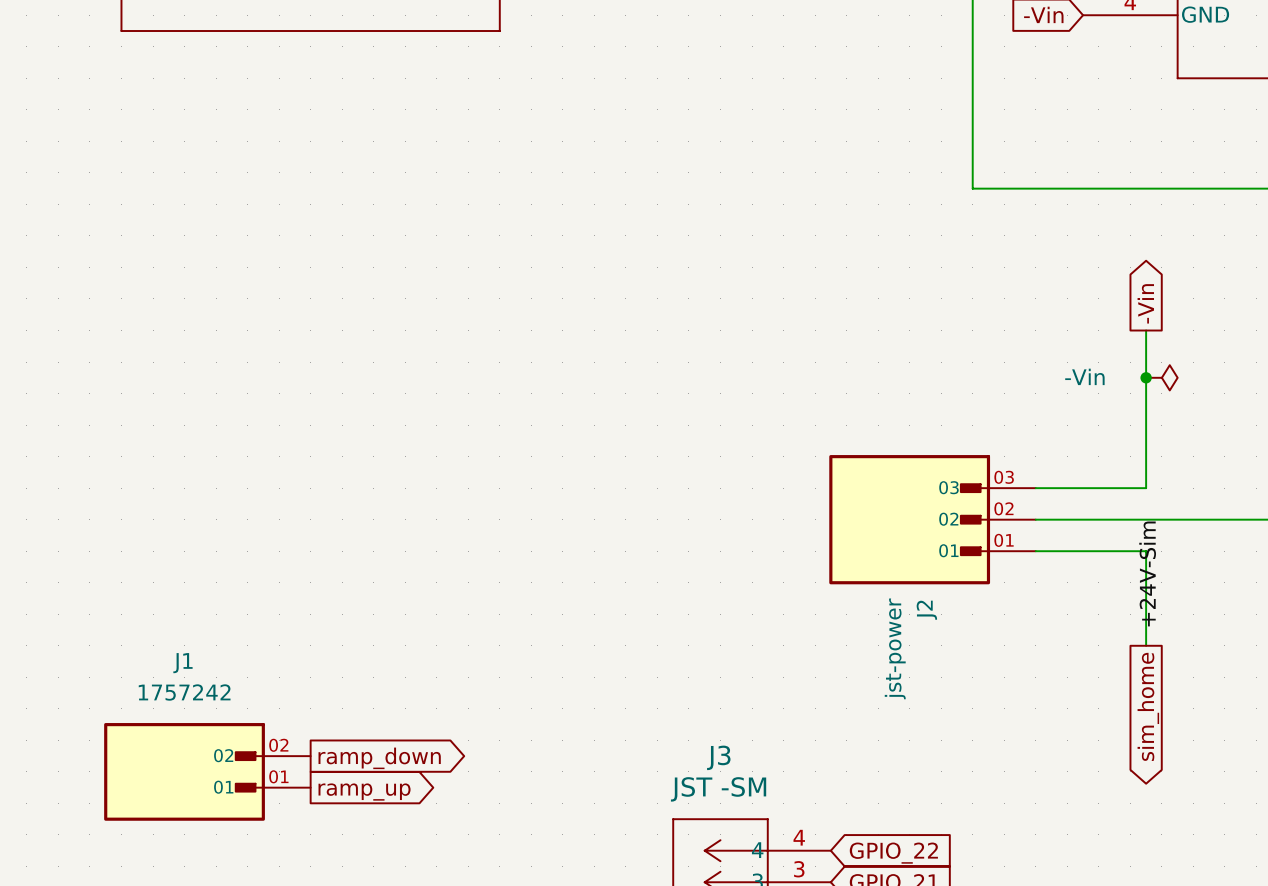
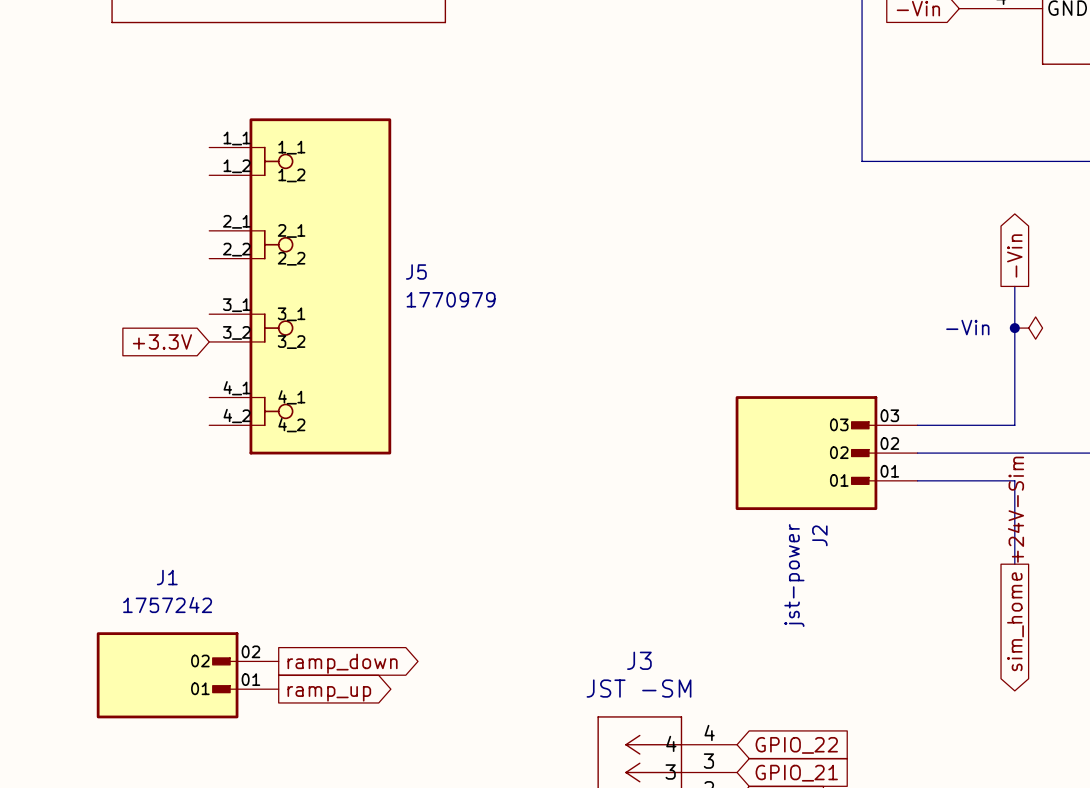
J5: none -> 1770979 (300, 286)
global label: none -> +3.3V (162, 341)

